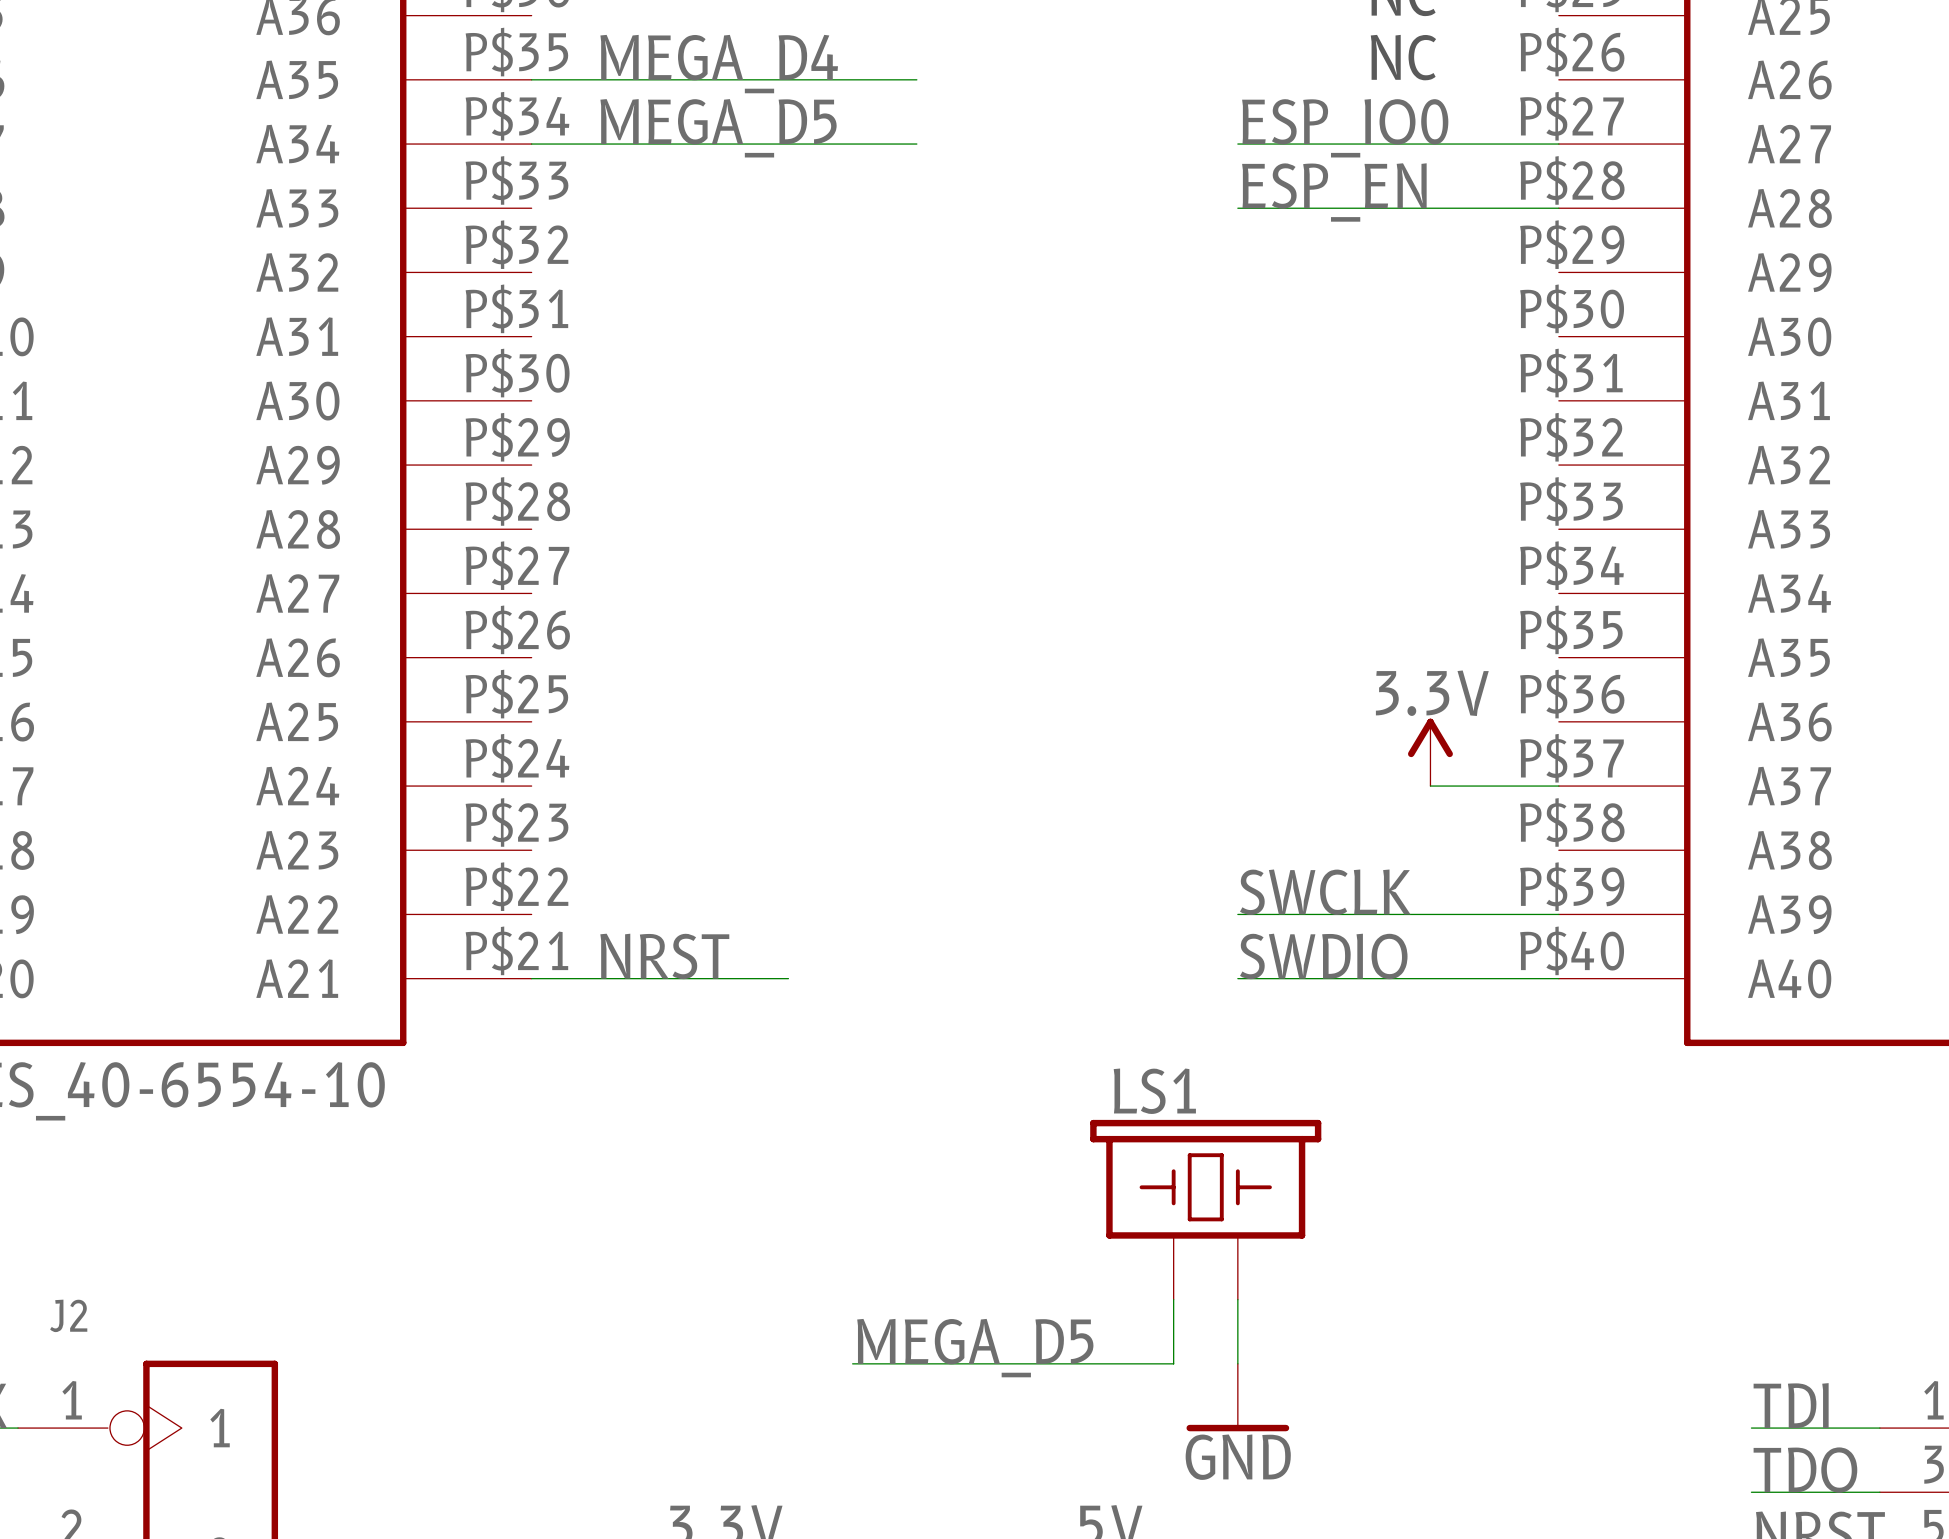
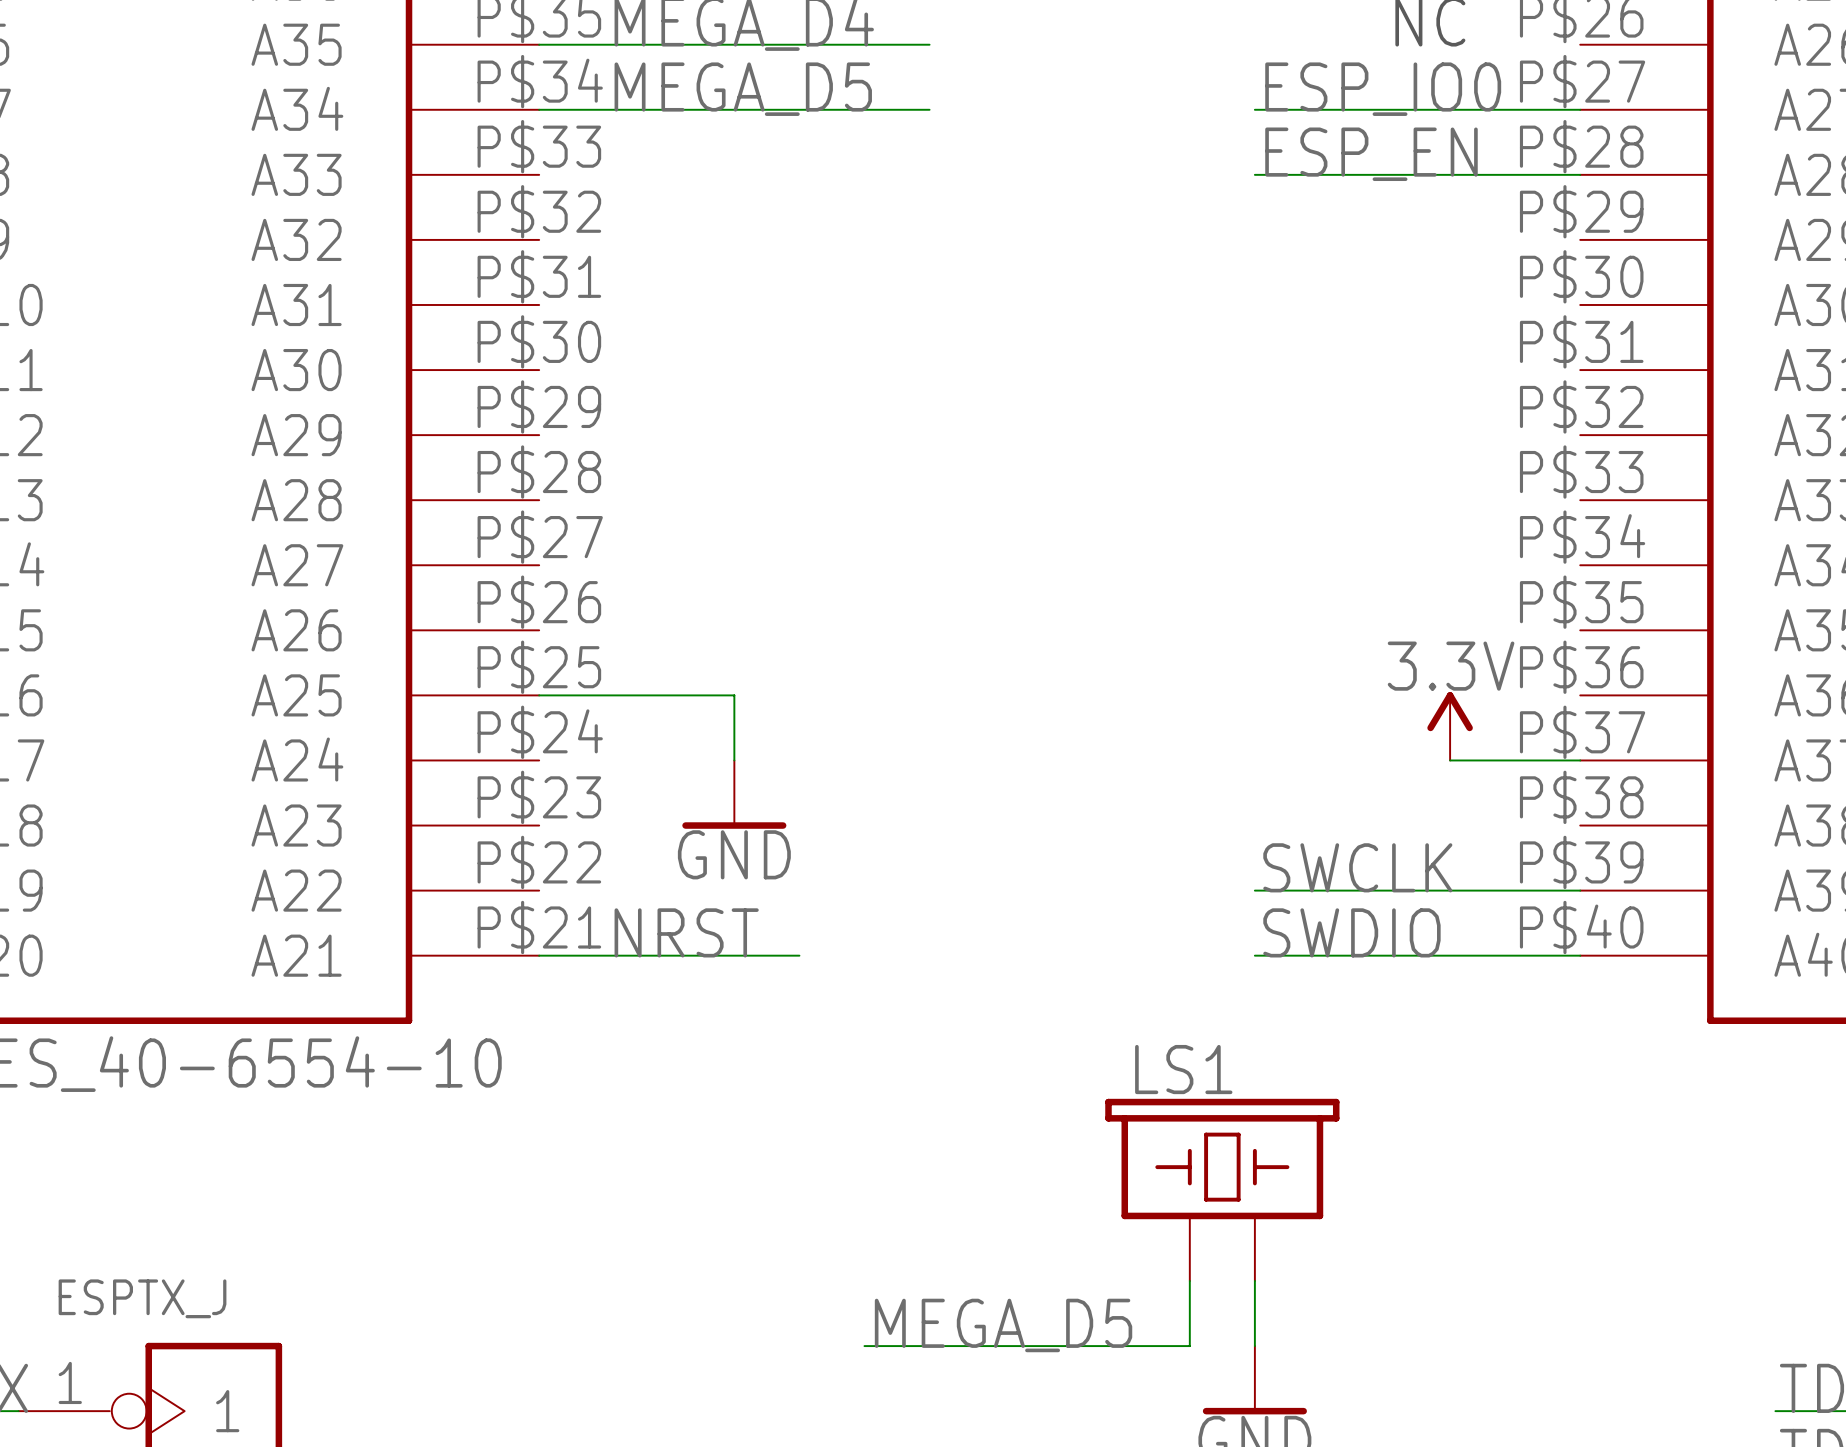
wire: none -> (539, 695) (734, 695) (734, 760)
power symbol: none -> GND (734, 794)
J2 name: J2 (68, 1315) -> ESPTX_J (142, 1298)

